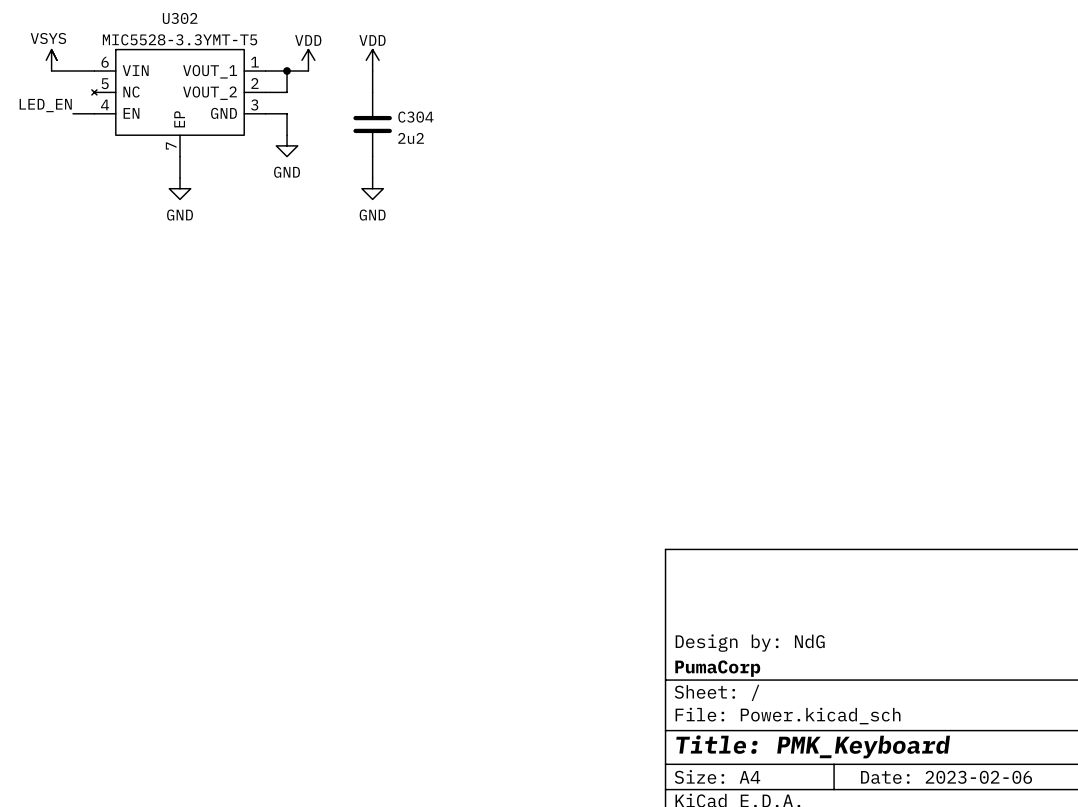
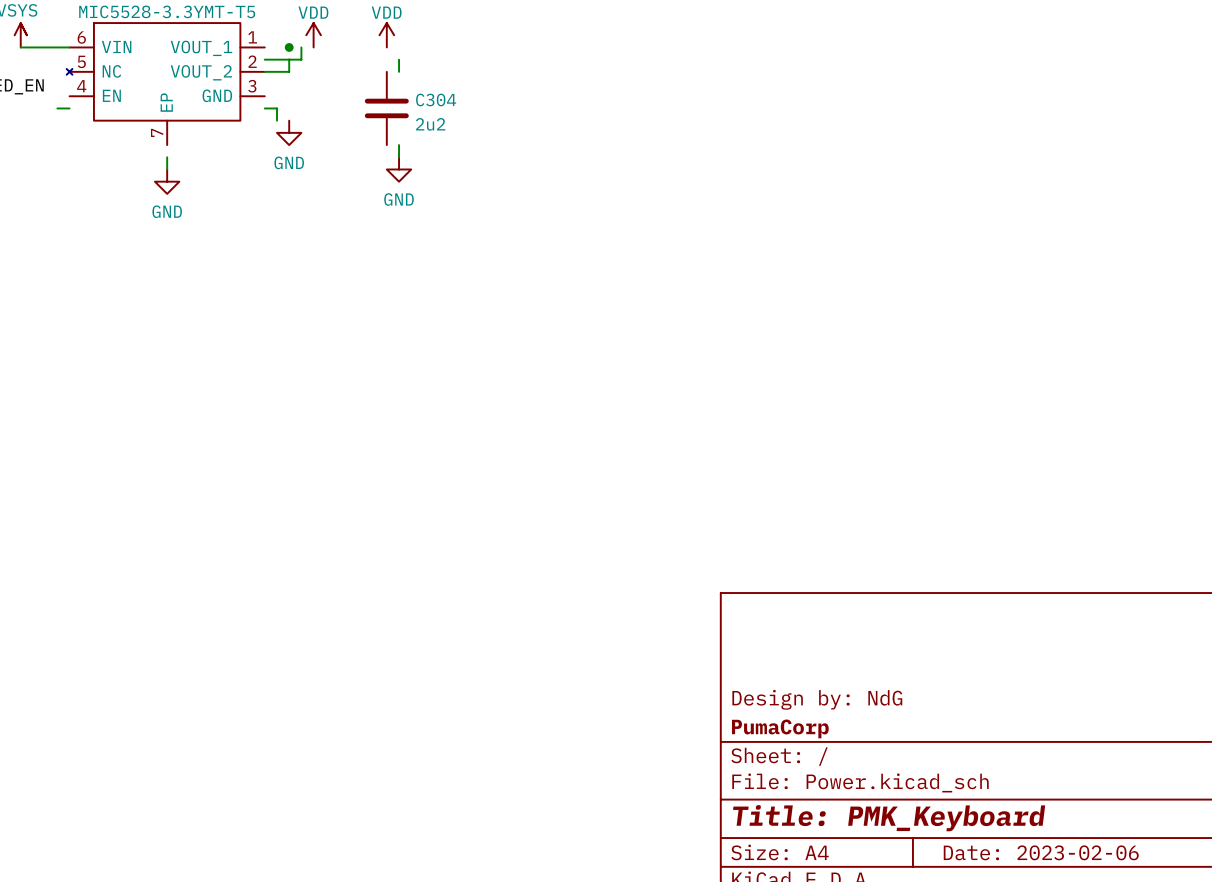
wire: (265, 71) (308, 71) -> none
wire: (287, 71) (287, 81) -> (399, 59) (399, 71)
wire: none -> (301, 47) (301, 59) (264, 59)
wire: (372, 71) (372, 92) -> none
wire: (73, 113) (94, 113) -> none
wire: (265, 113) (287, 113) (287, 135) -> none
wire: none -> (57, 108) (69, 108)
wire: none -> (264, 108) (277, 108) (277, 120)
wire: (180, 156) (180, 167) -> (399, 145) (399, 157)
wire: (372, 156) (372, 178) -> none
power symbol position: GND (372, 188) -> GND (399, 169)

